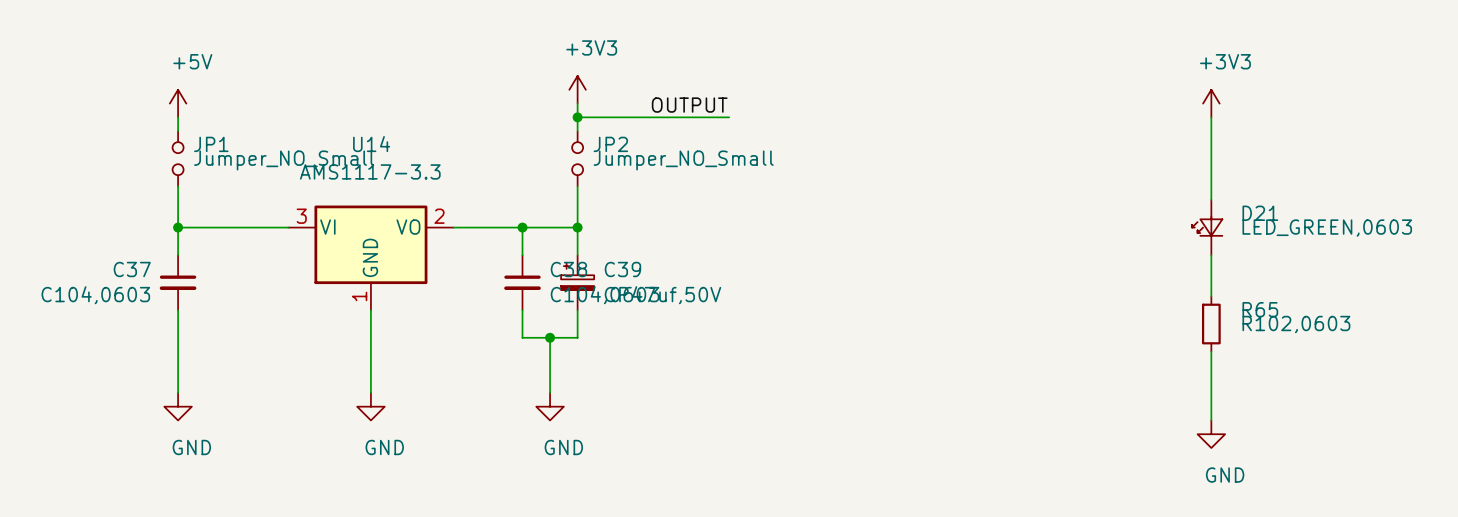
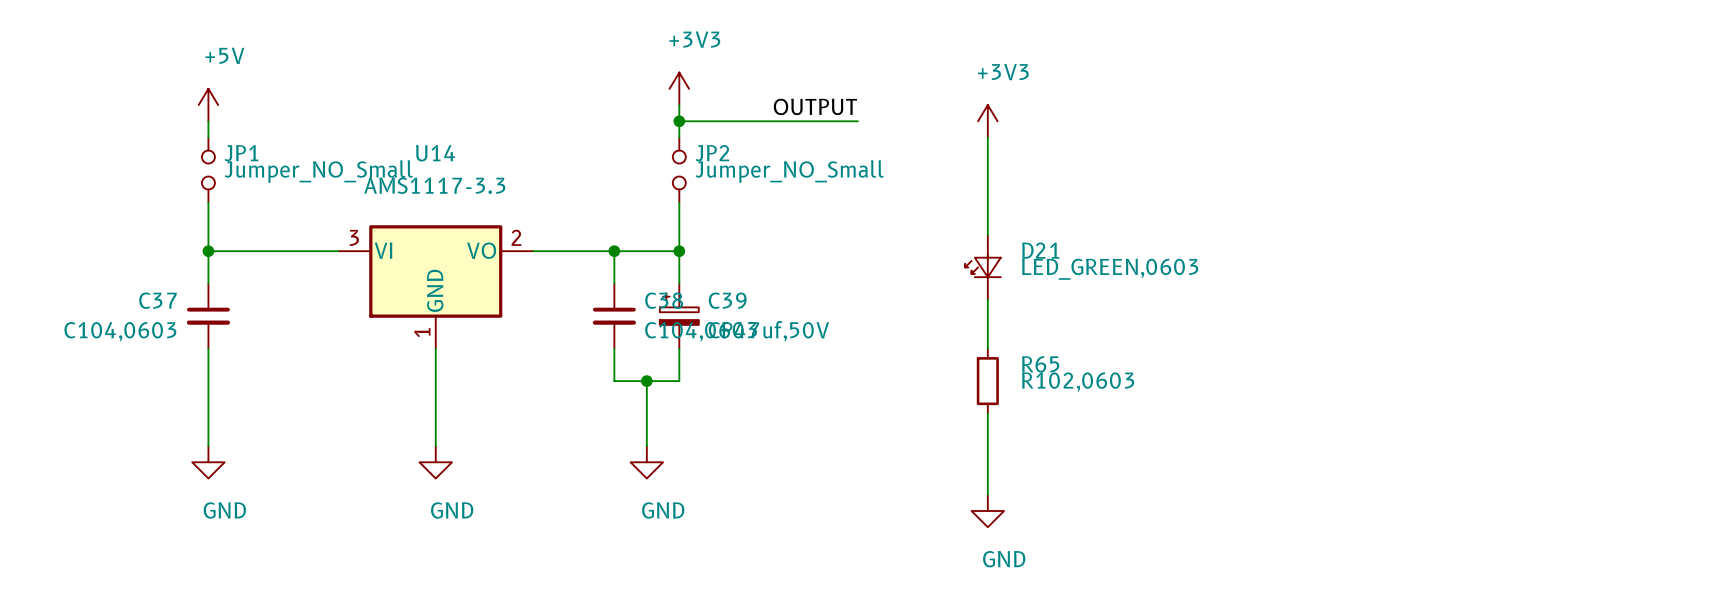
power symbol: +3V3 (1211, 103) -> none
power symbol: none -> +3V3 (987, 121)
wire: (1211, 117) (1211, 200) -> none
wire: none -> (987, 137) (987, 234)
D21 position: (1207, 227) -> (982, 267)
wire: (1211, 255) (1211, 296) -> none
wire: none -> (987, 299) (987, 348)
R65 position: (1211, 324) -> (987, 381)
wire: (1211, 351) (1211, 420) -> none
wire: none -> (987, 413) (987, 494)
power symbol: GND (1211, 434) -> none
power symbol: none -> GND (987, 510)

